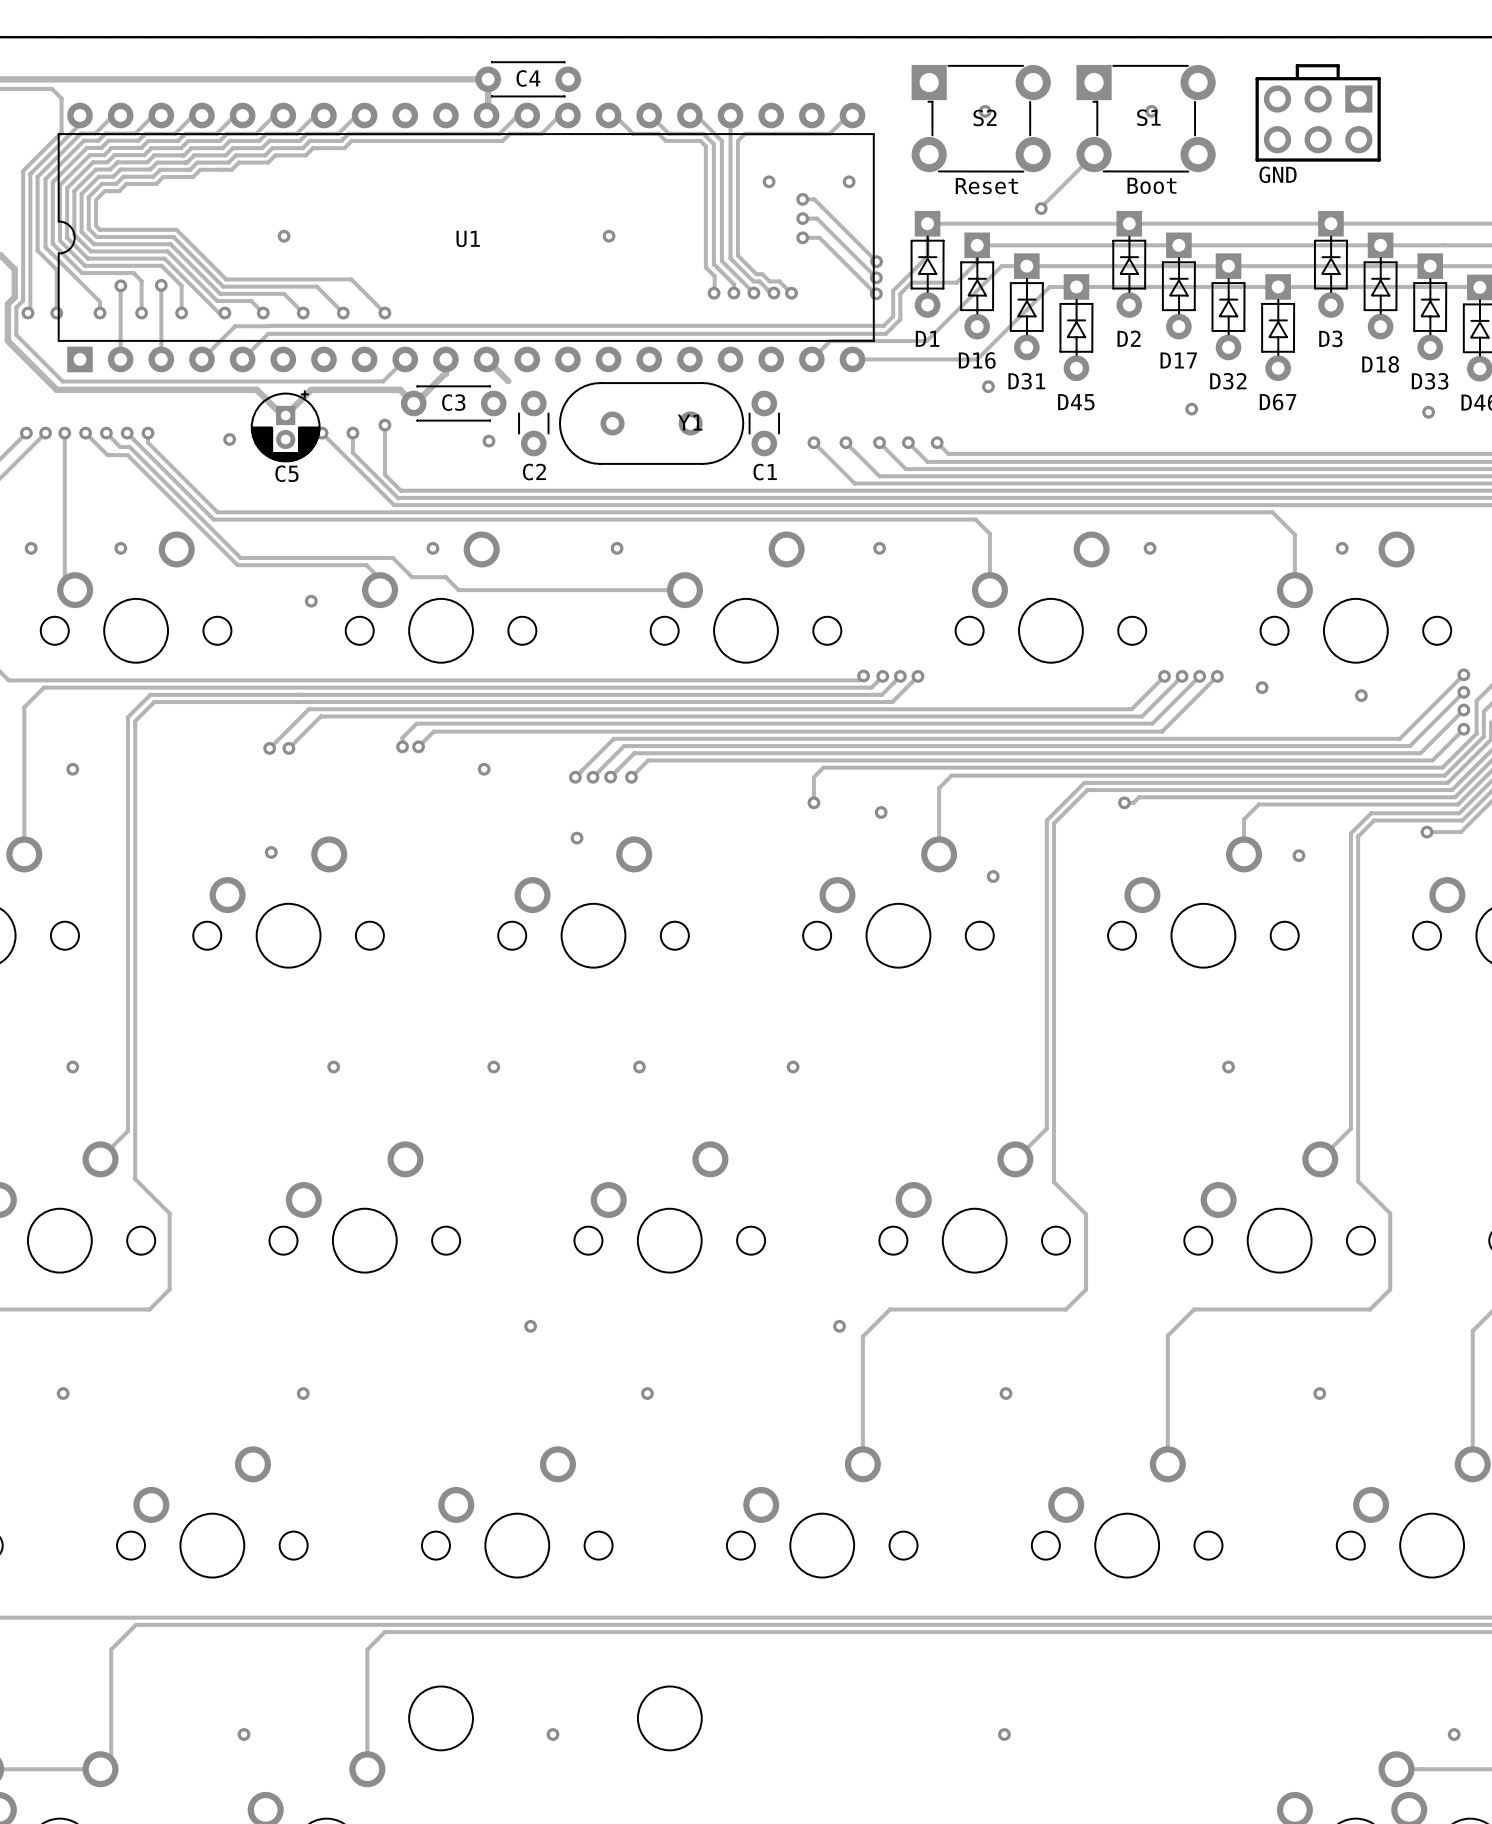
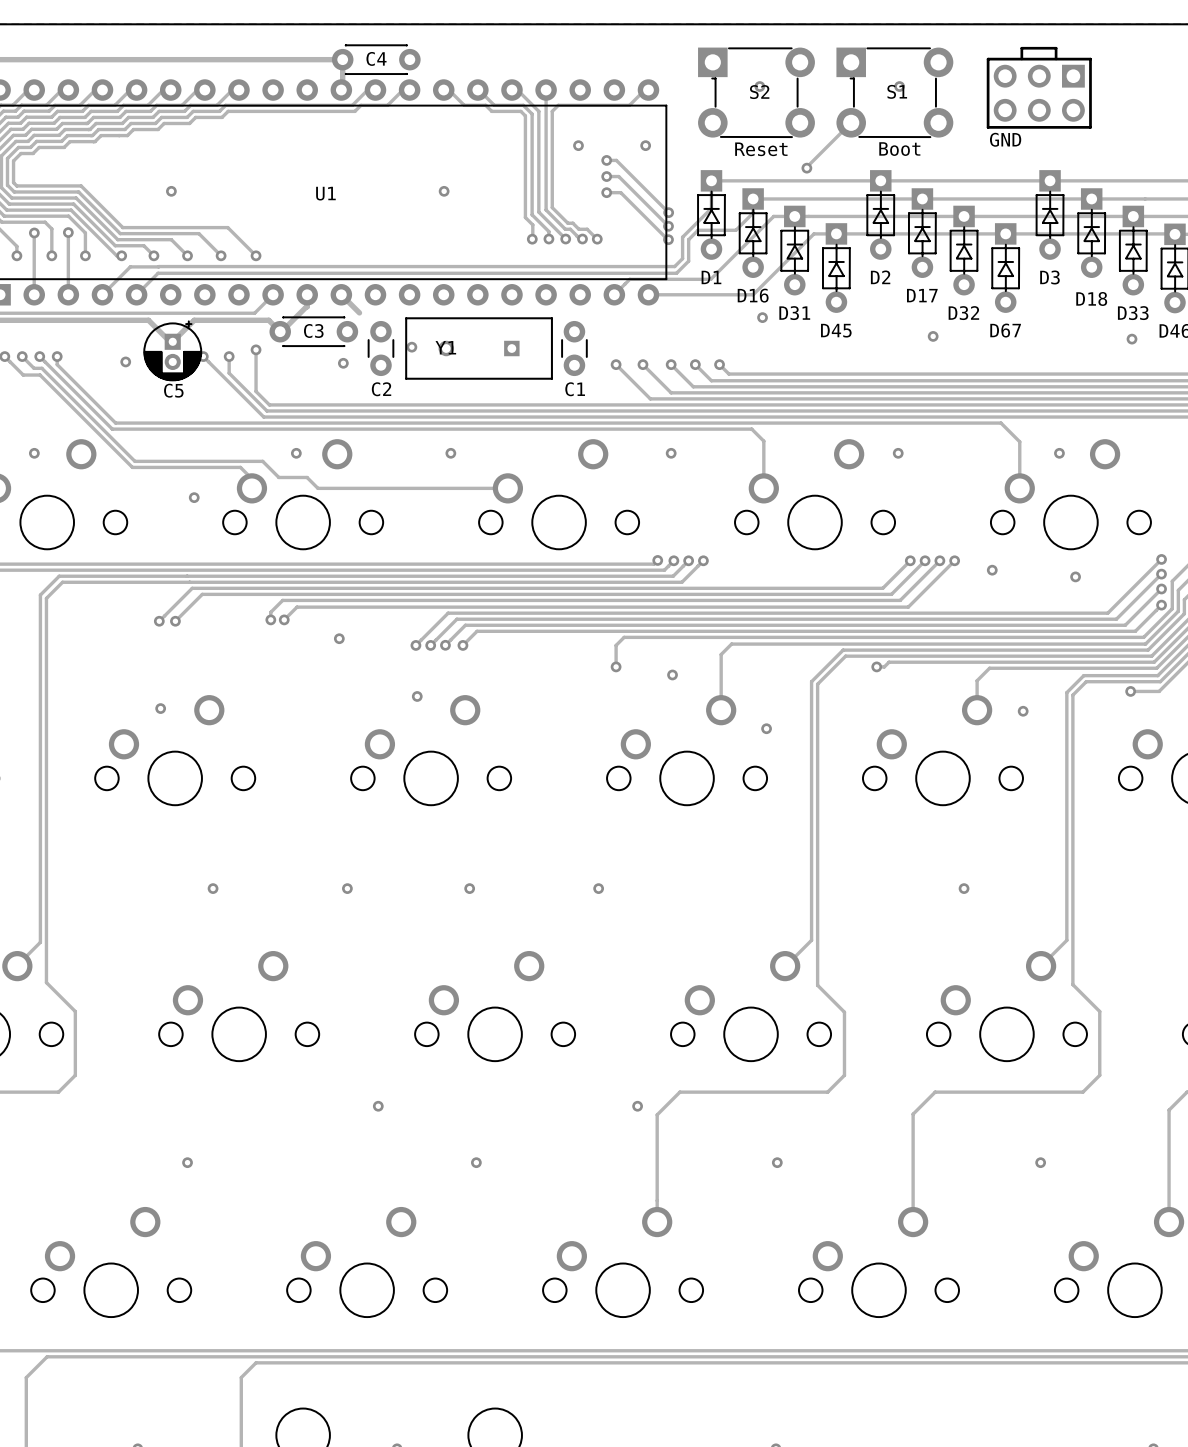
Y1 footprint: [559, 382, 745, 465] -> [405, 317, 553, 380]
via: none -> (411, 347)
Y1 name position: Y1 (690, 422) -> Y1 (445, 347)

